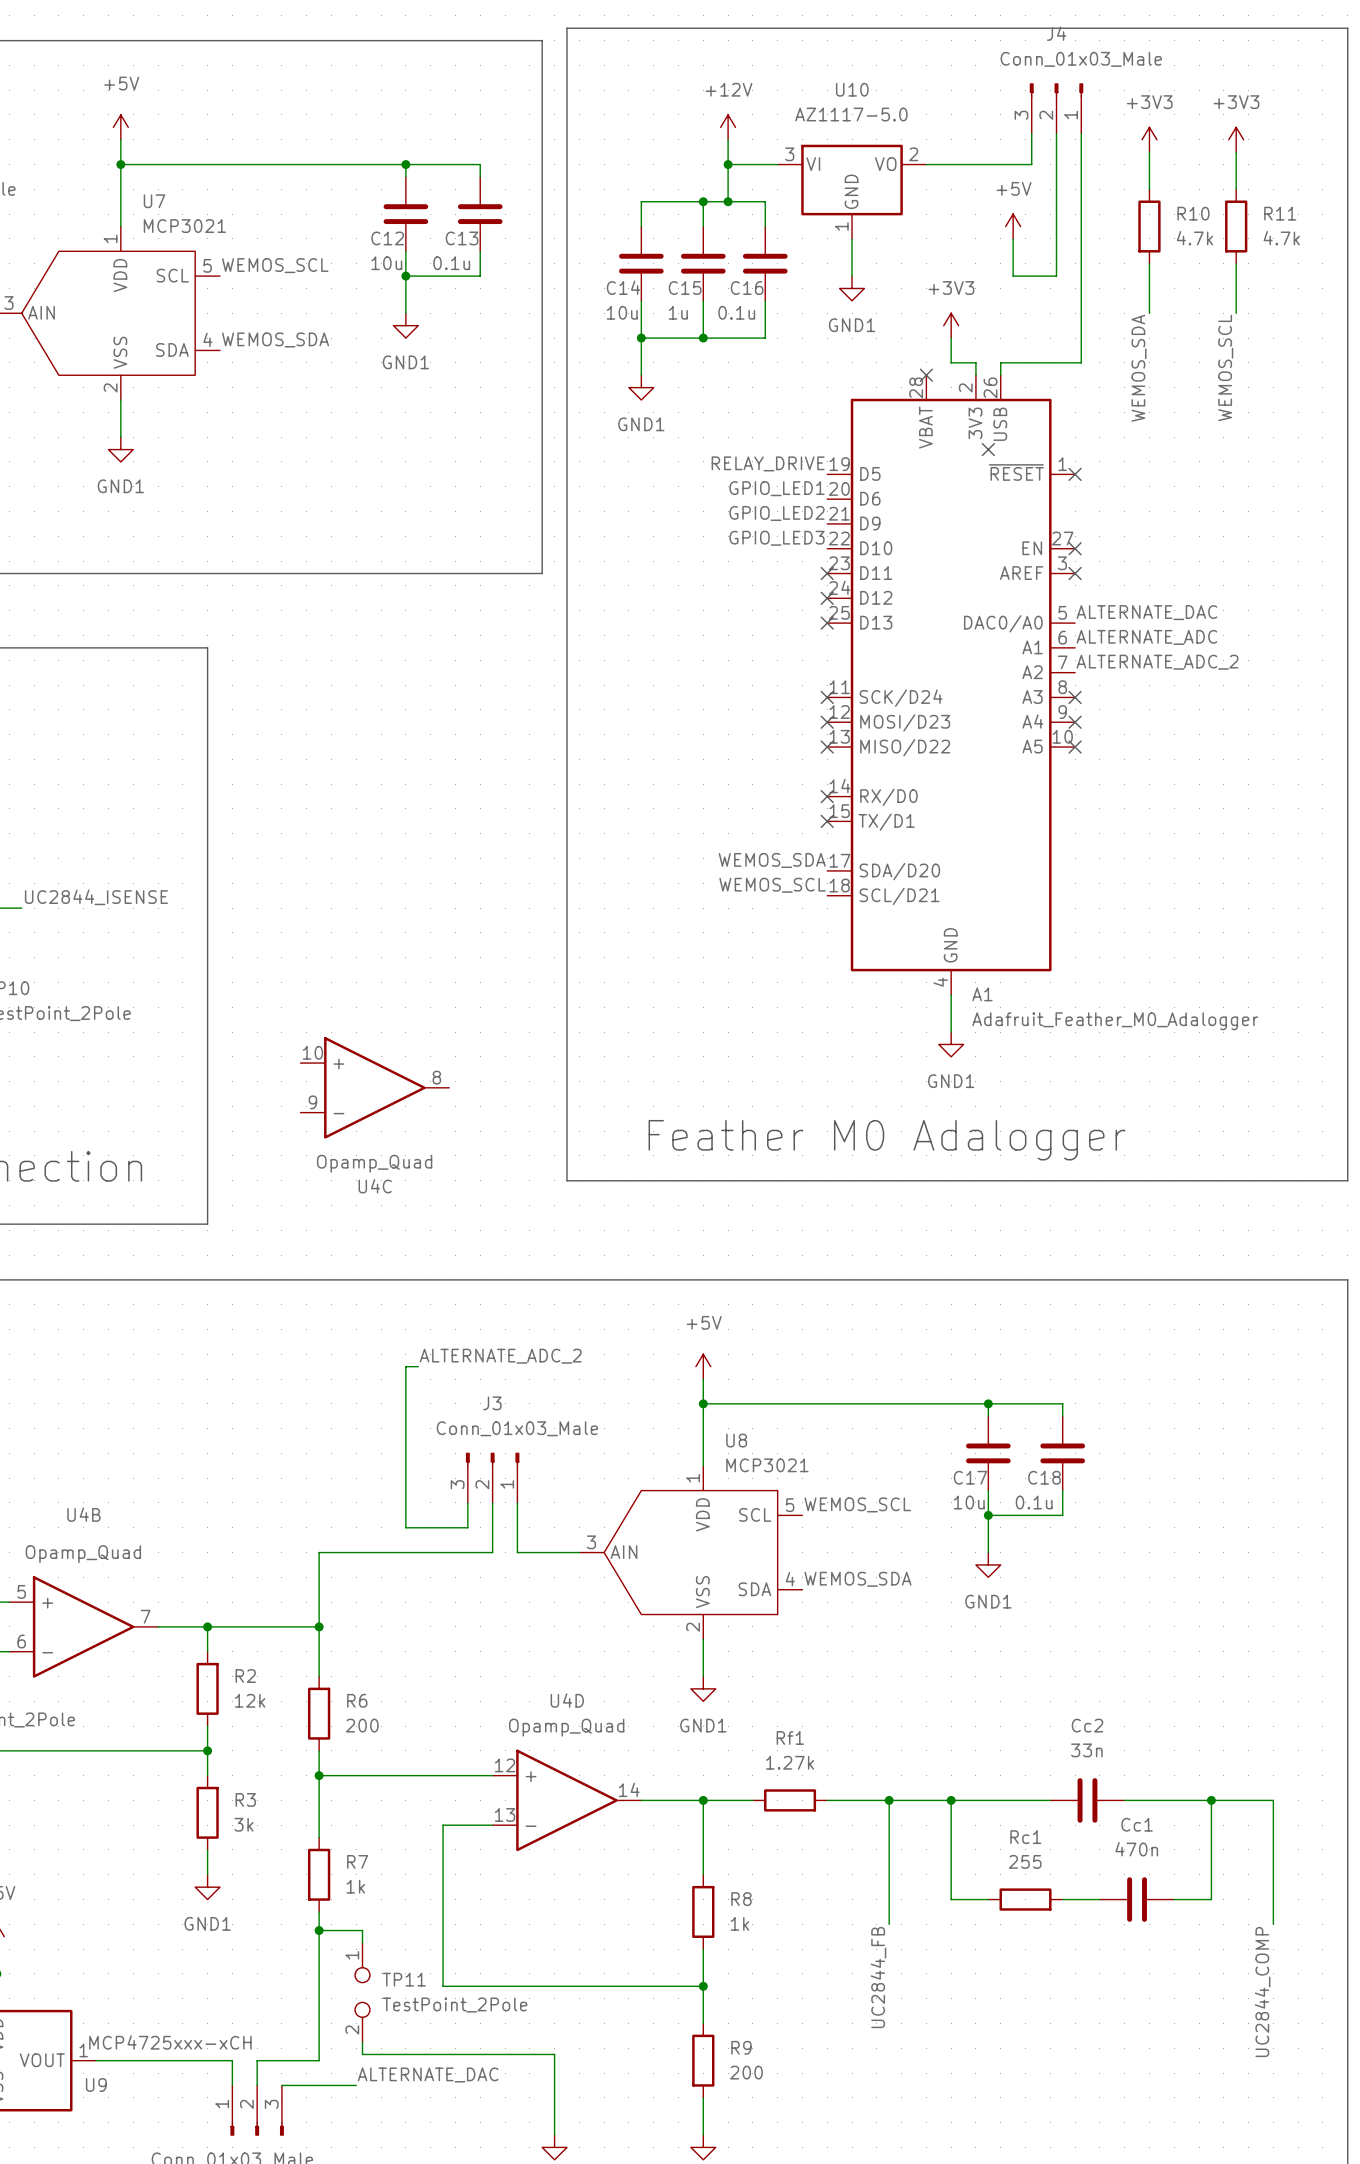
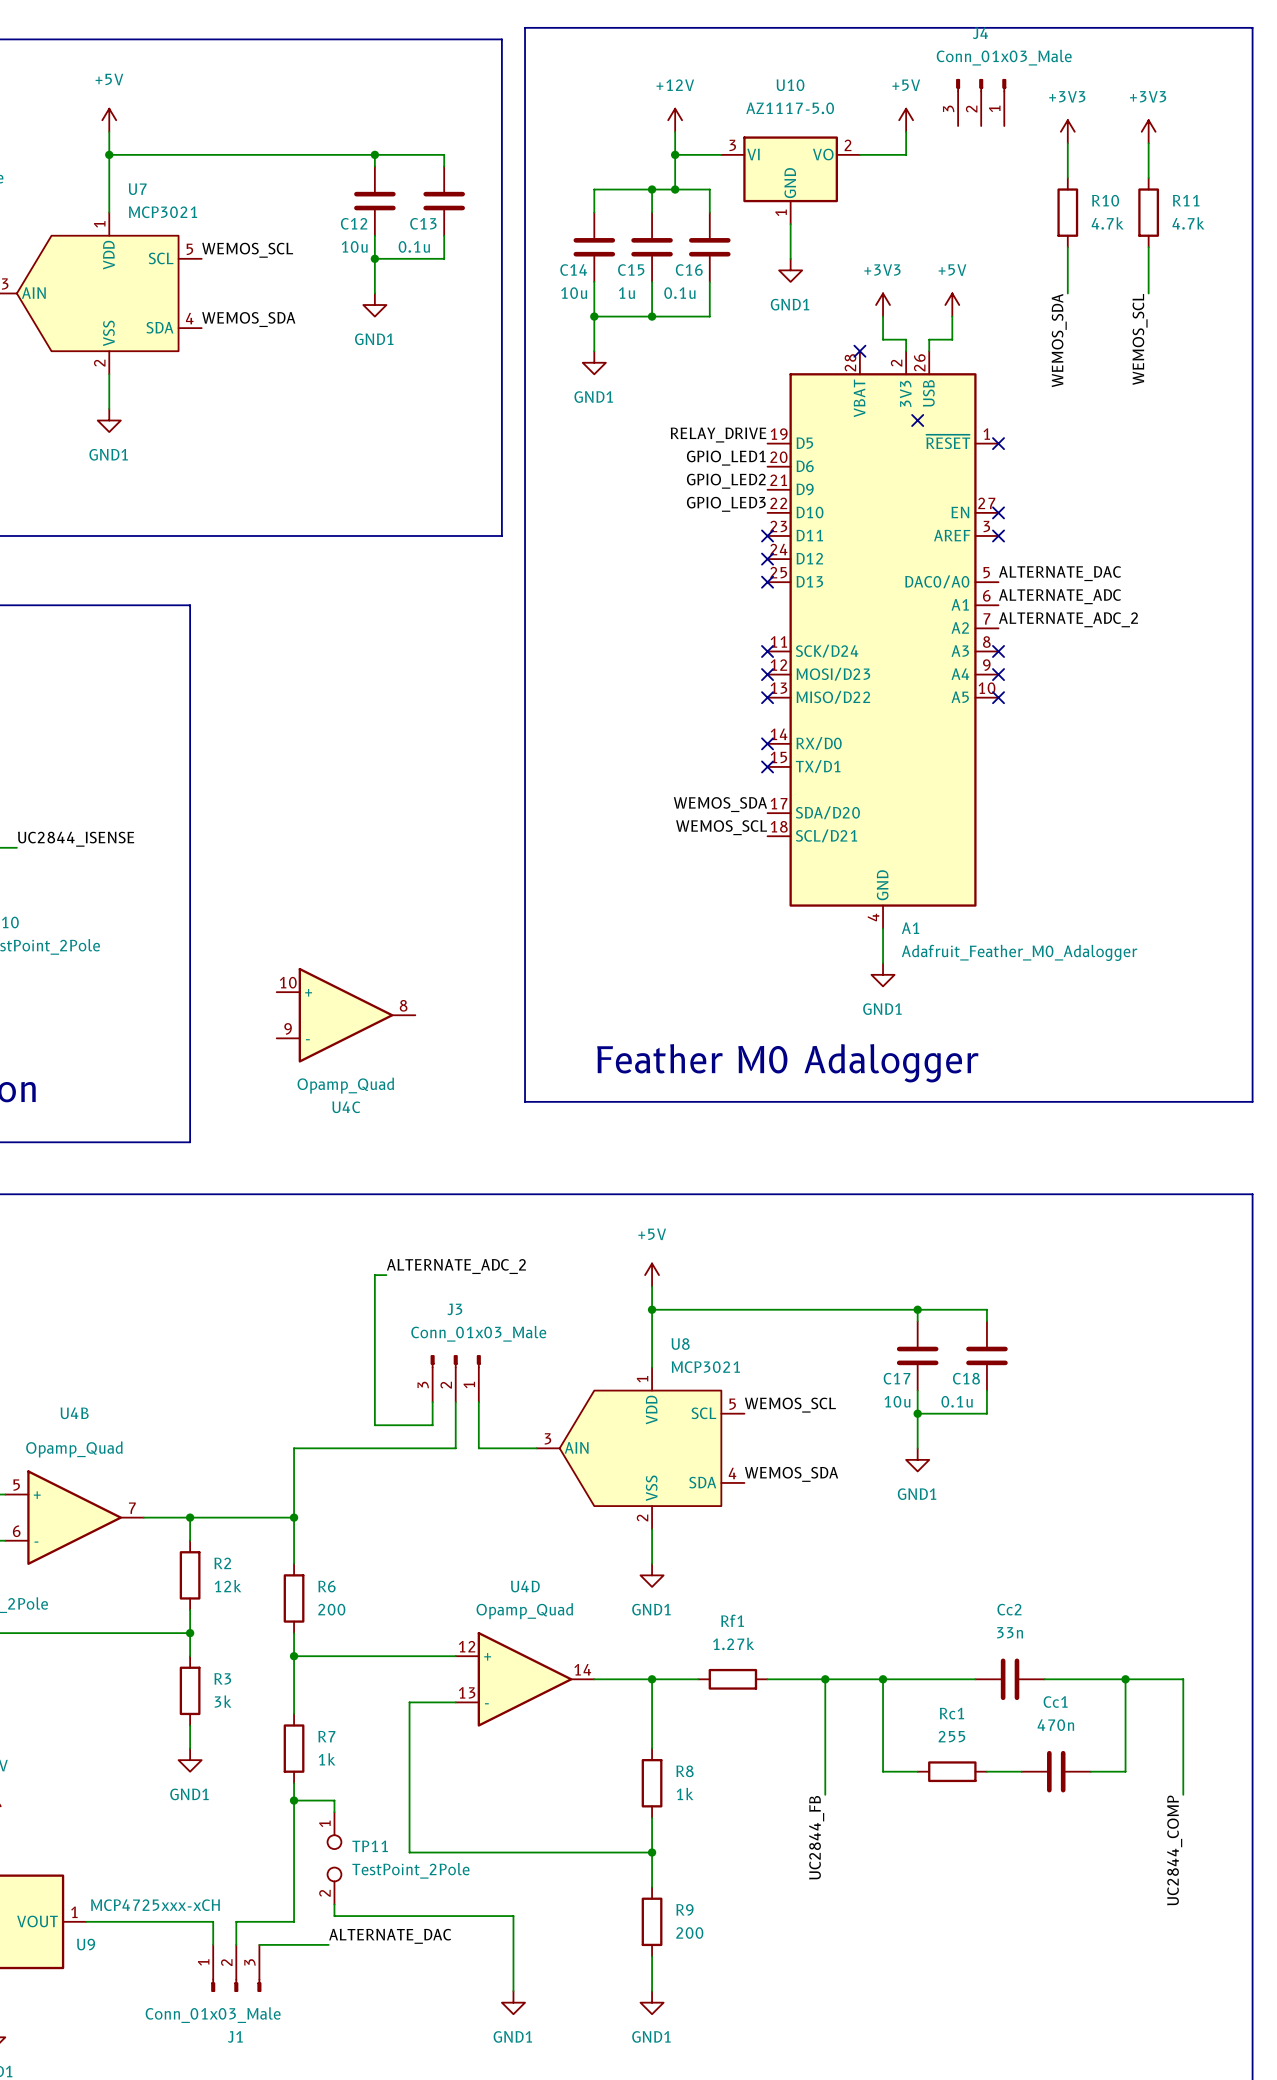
power symbol: none -> +5V (906, 120)
wire: (1031, 133) (1031, 164) (975, 164) -> (906, 131) (906, 154)
wire: (1056, 133) (1056, 276) (1013, 276) (1013, 238) -> none
wire: (1081, 133) (1081, 362) (1025, 362) -> (952, 316) (952, 339)
power symbol: +5V (1013, 226) -> none
power symbol: none -> +5V (952, 305)

